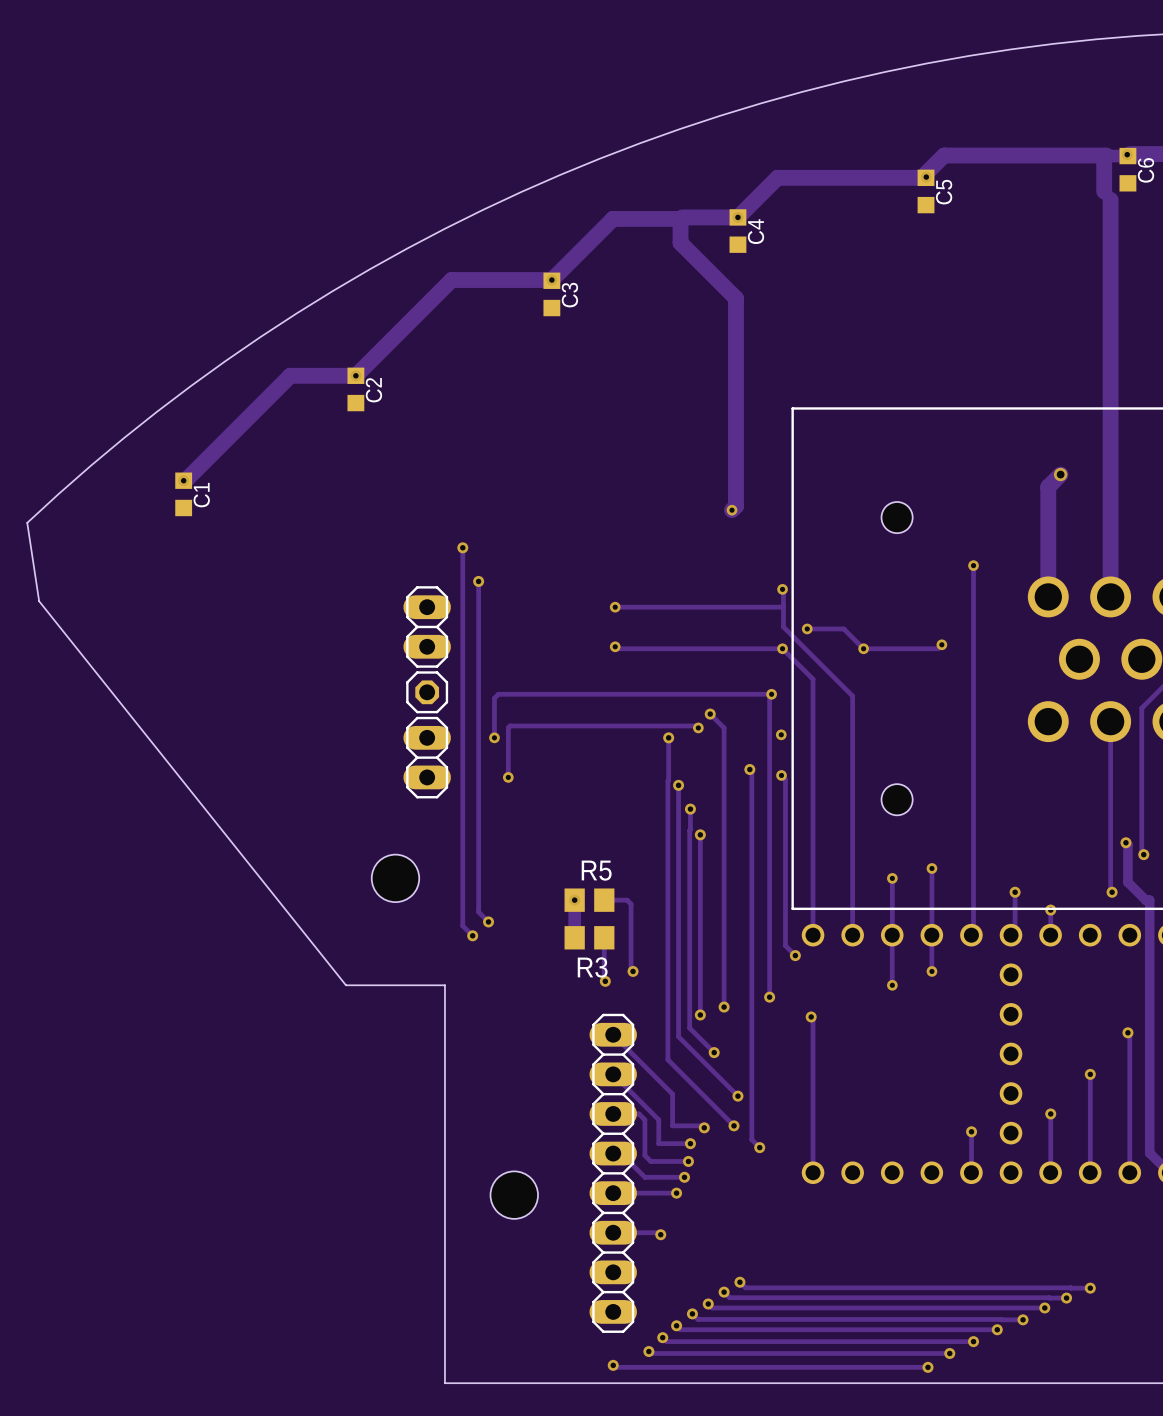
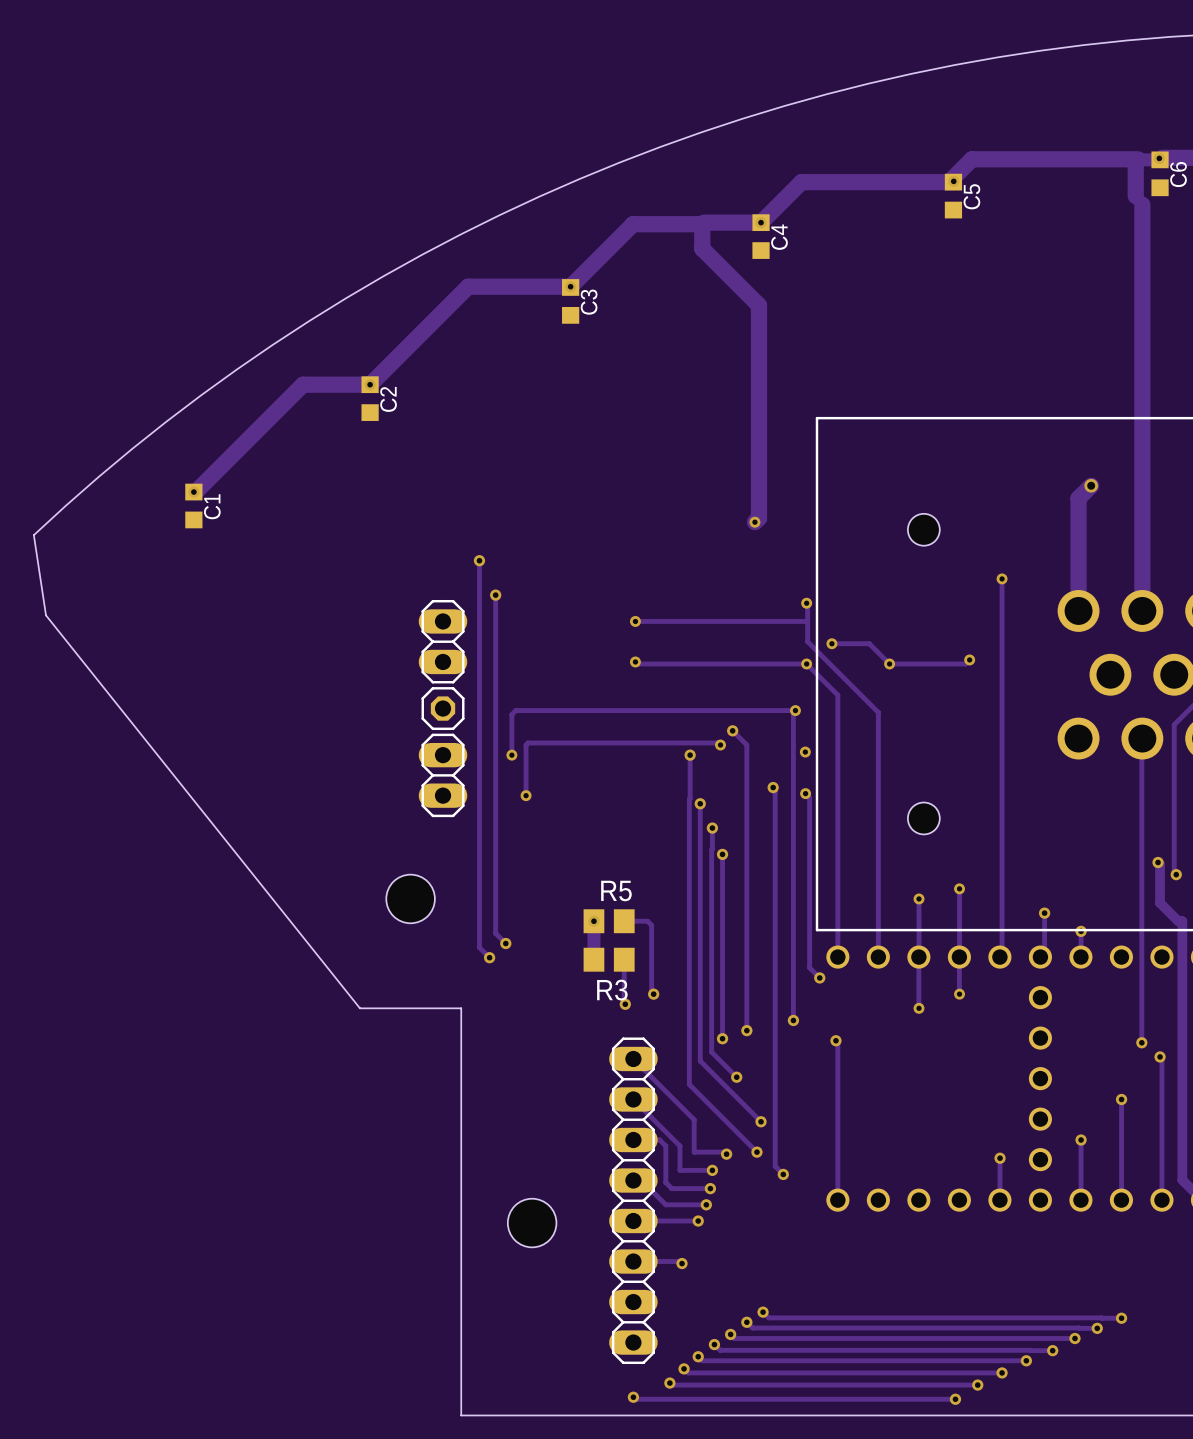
track: (1110, 721) (1112, 892) -> (1142, 738) (1141, 1042)
via: (1112, 892) -> none
via: none -> (1141, 1042)

